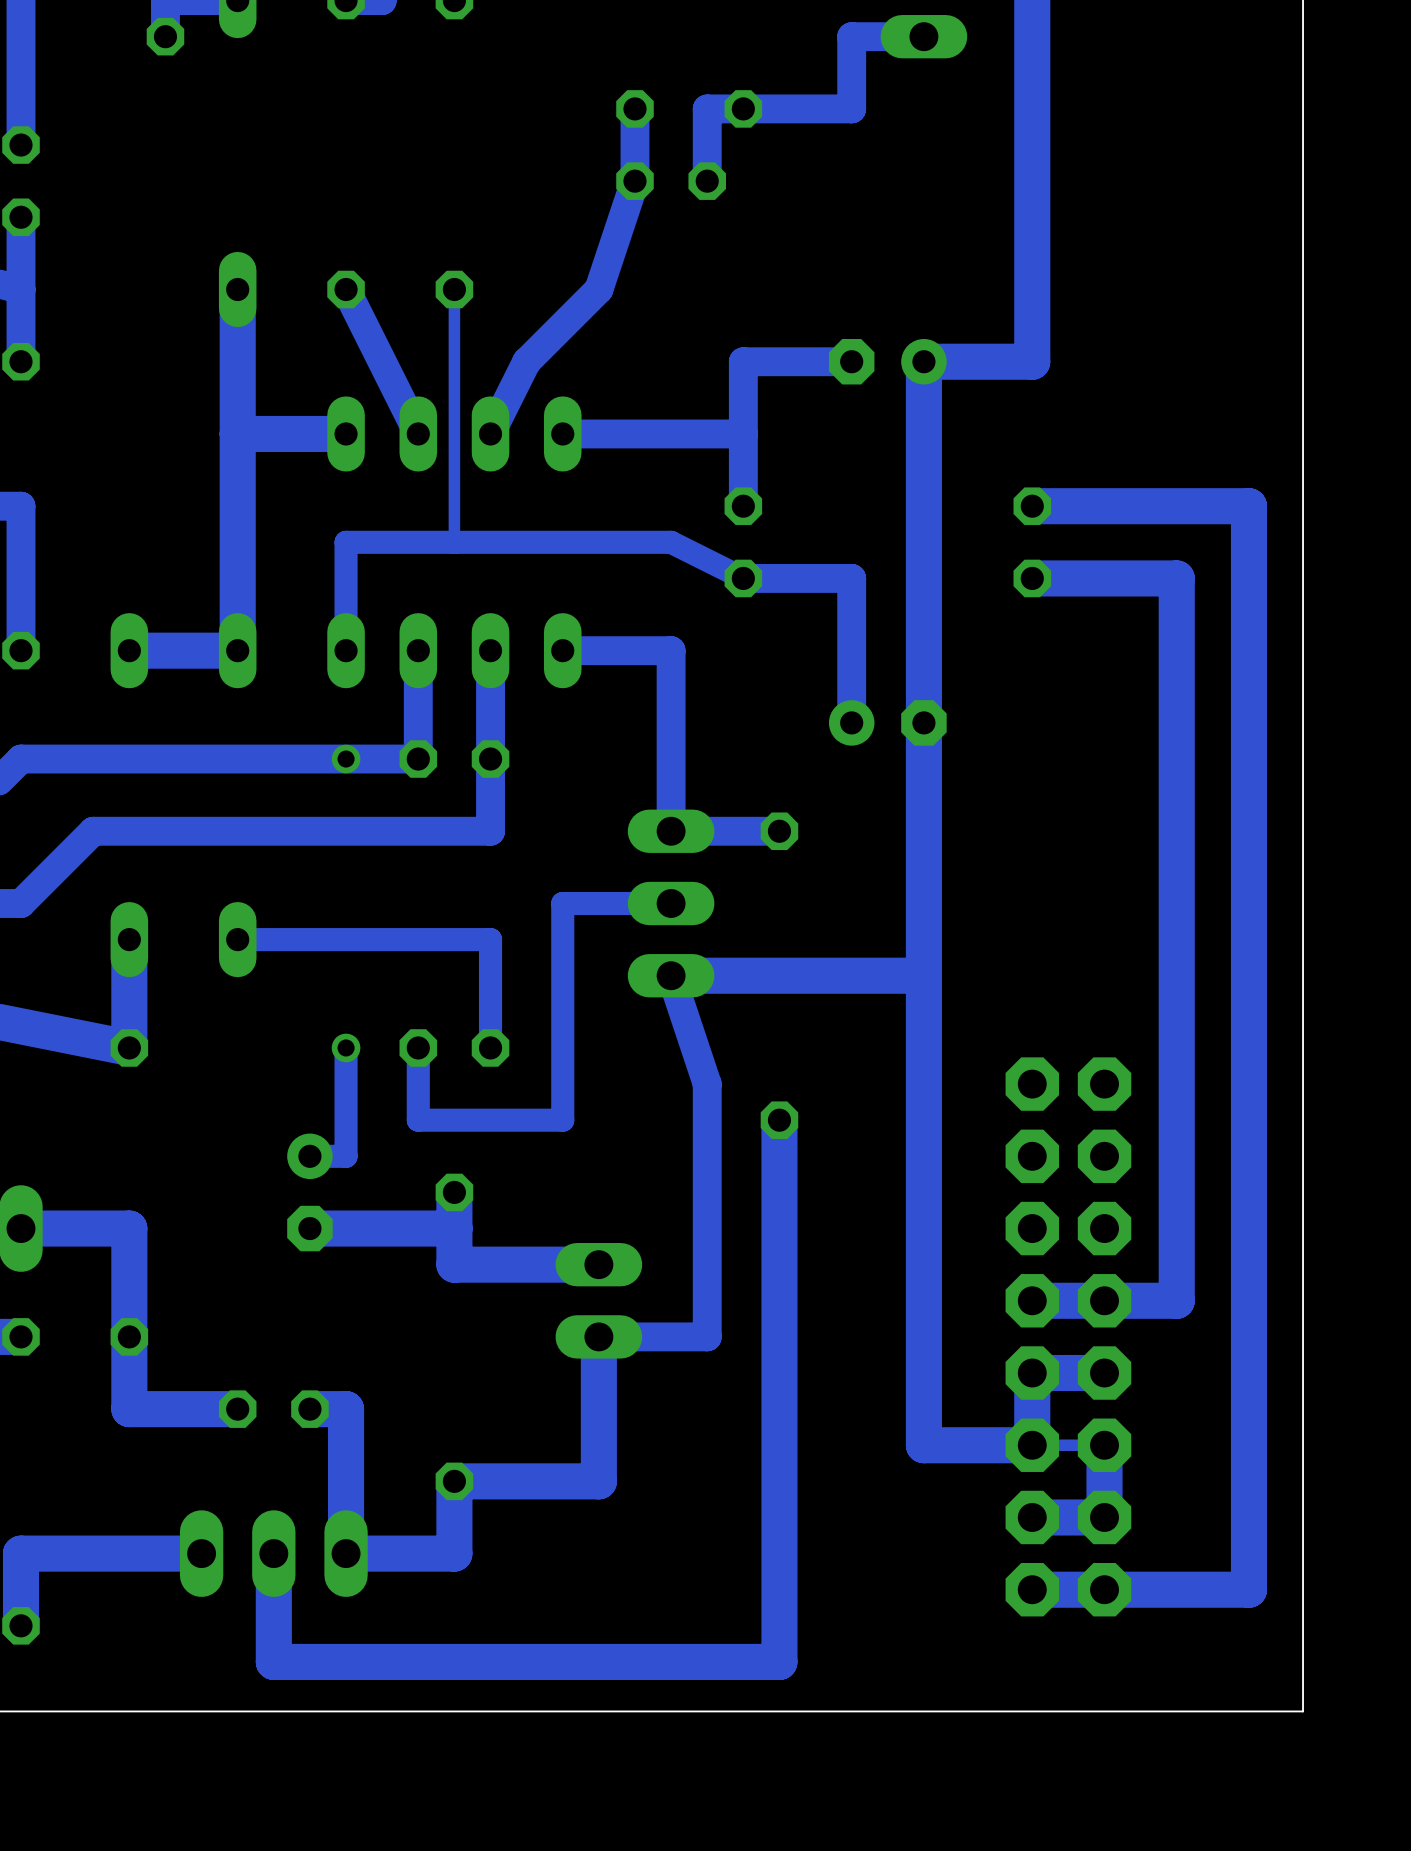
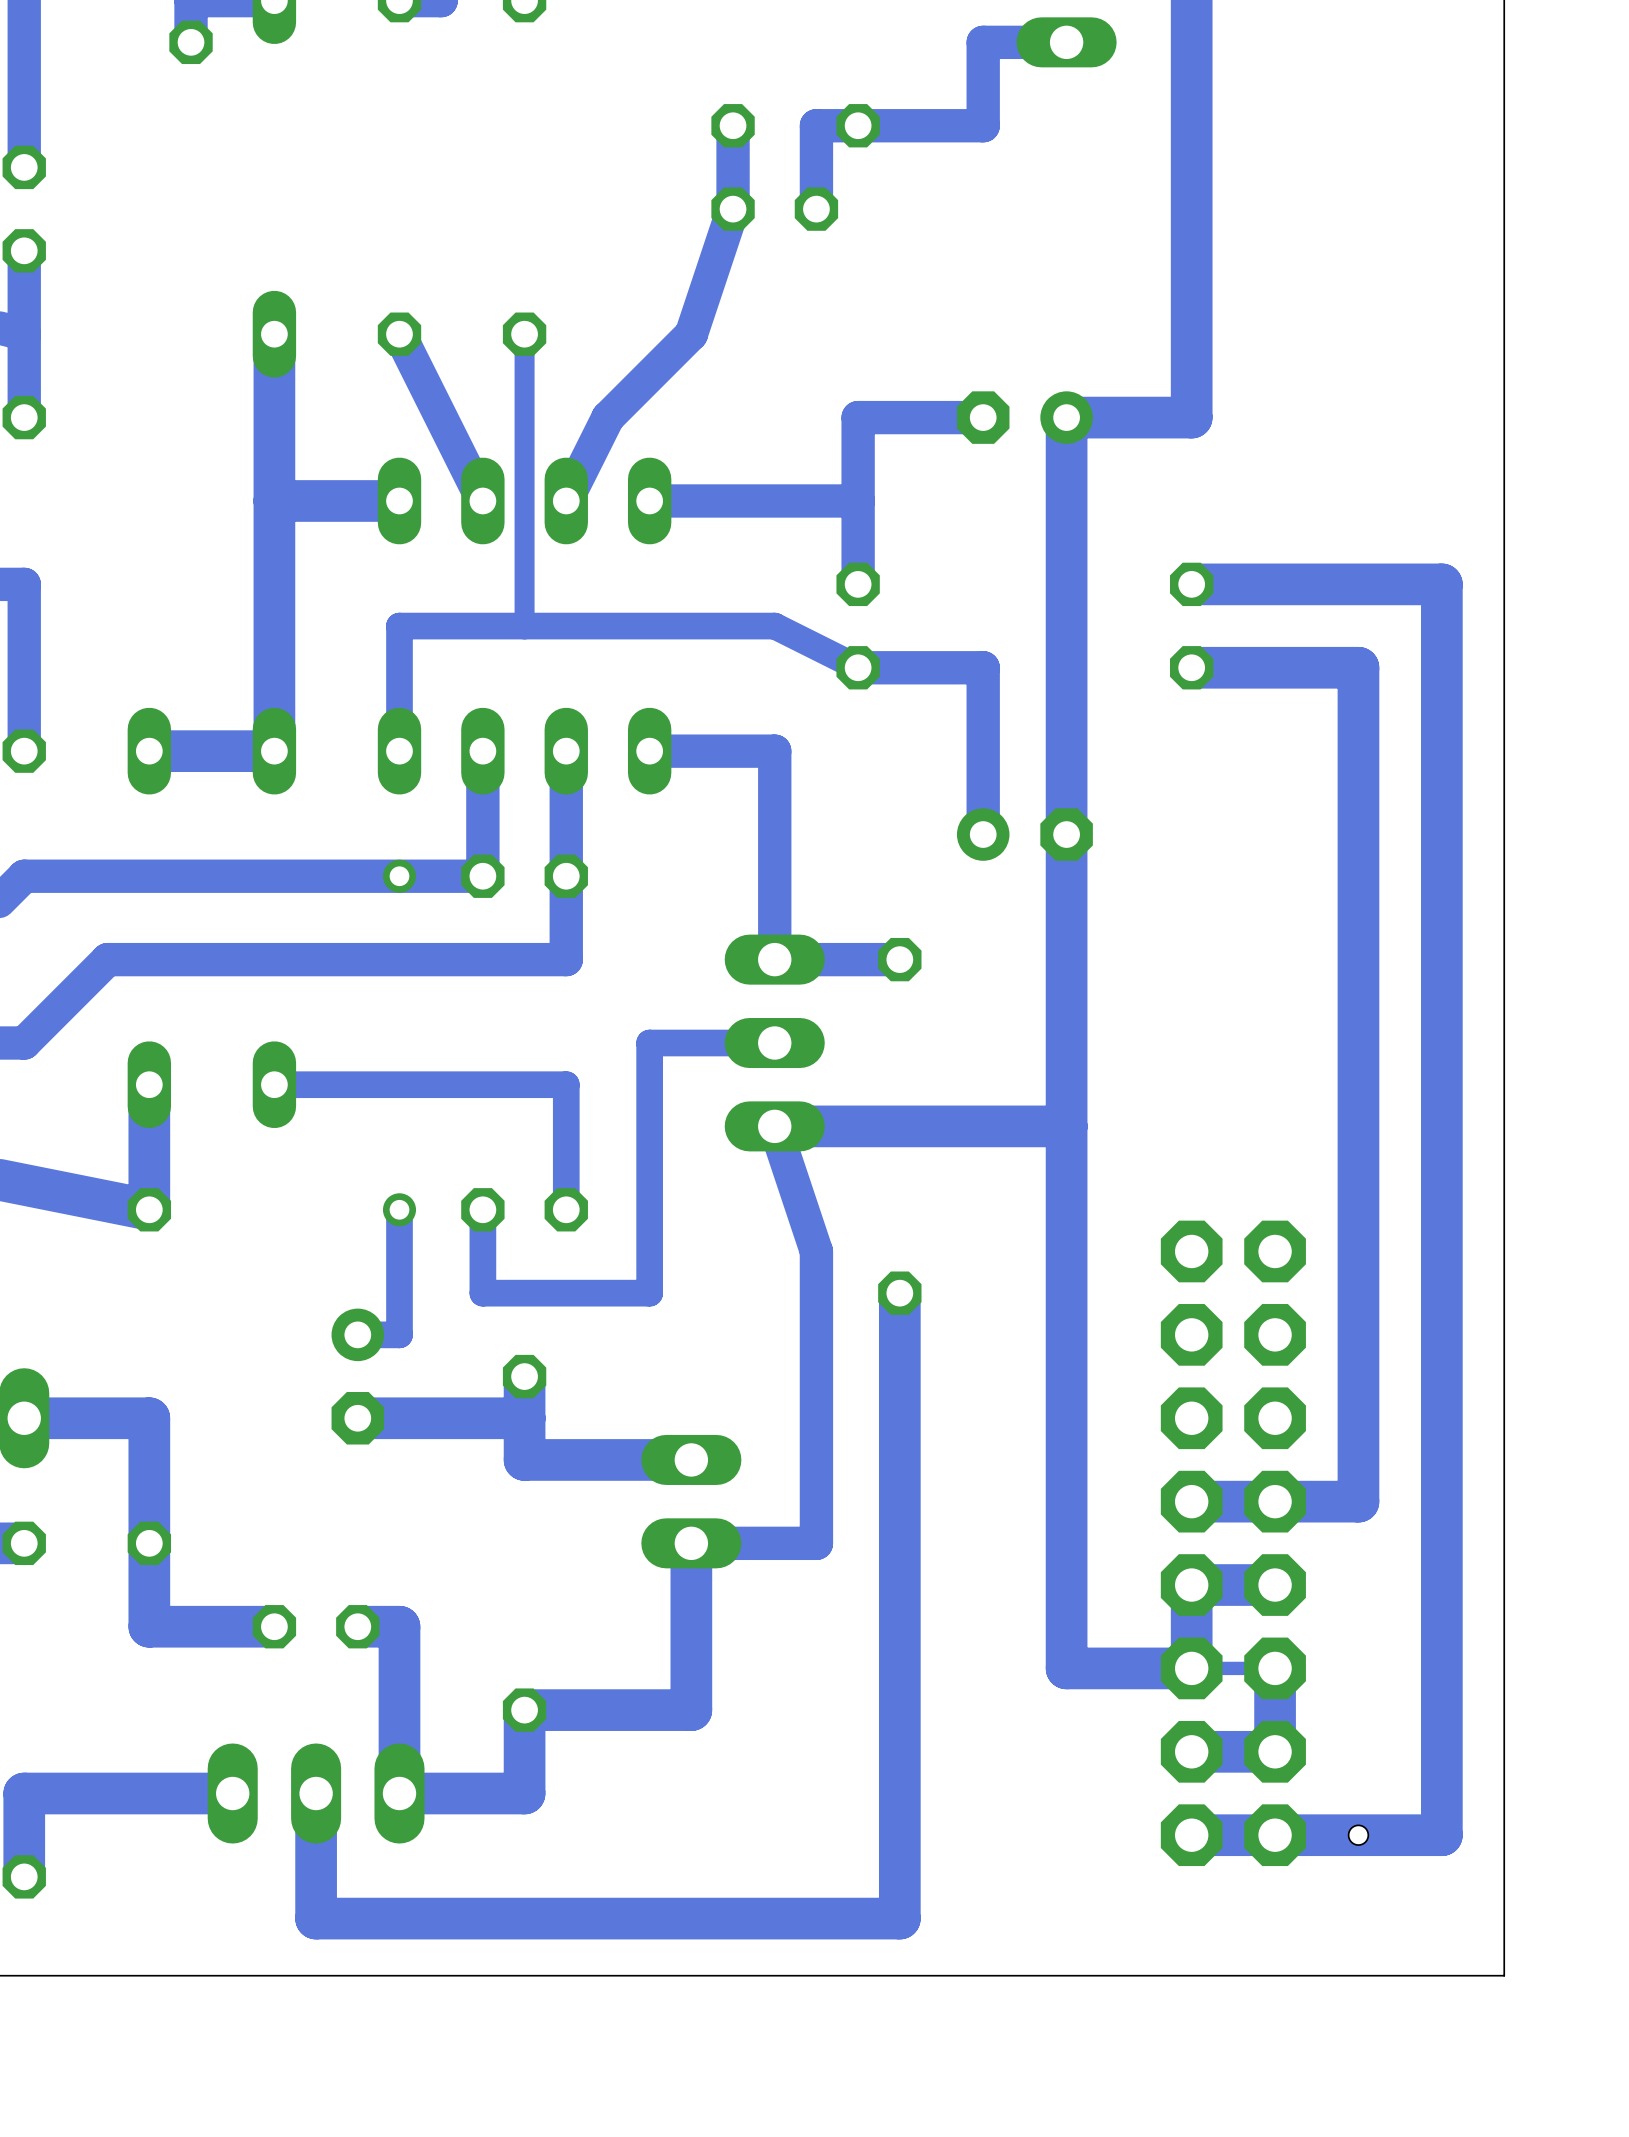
bottom track width: thin (454, 289) (454, 542) -> thick (524, 334) (524, 626)
hole: none -> (1358, 1835)

